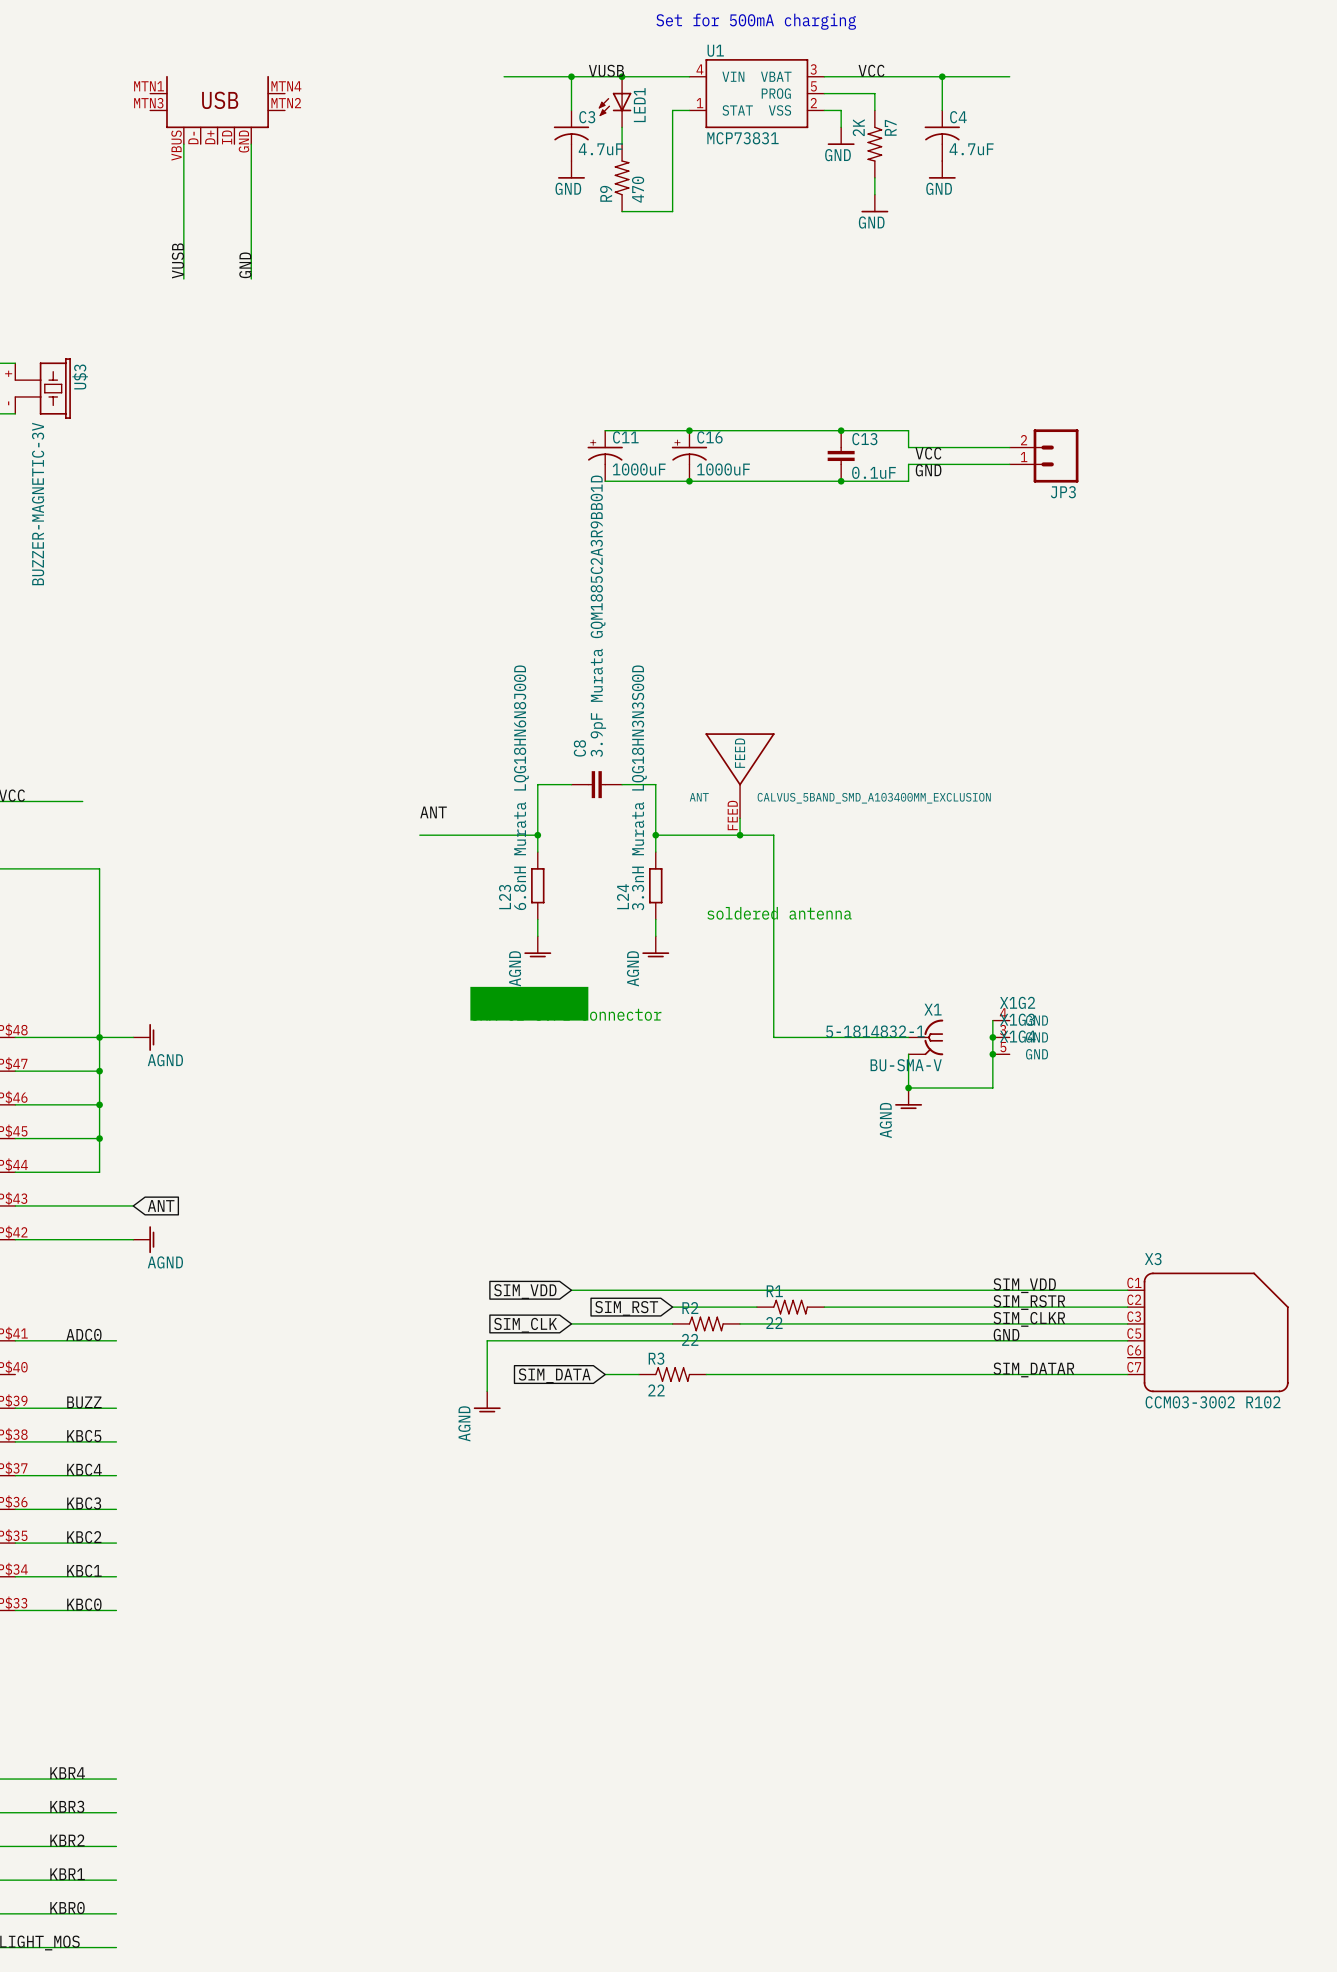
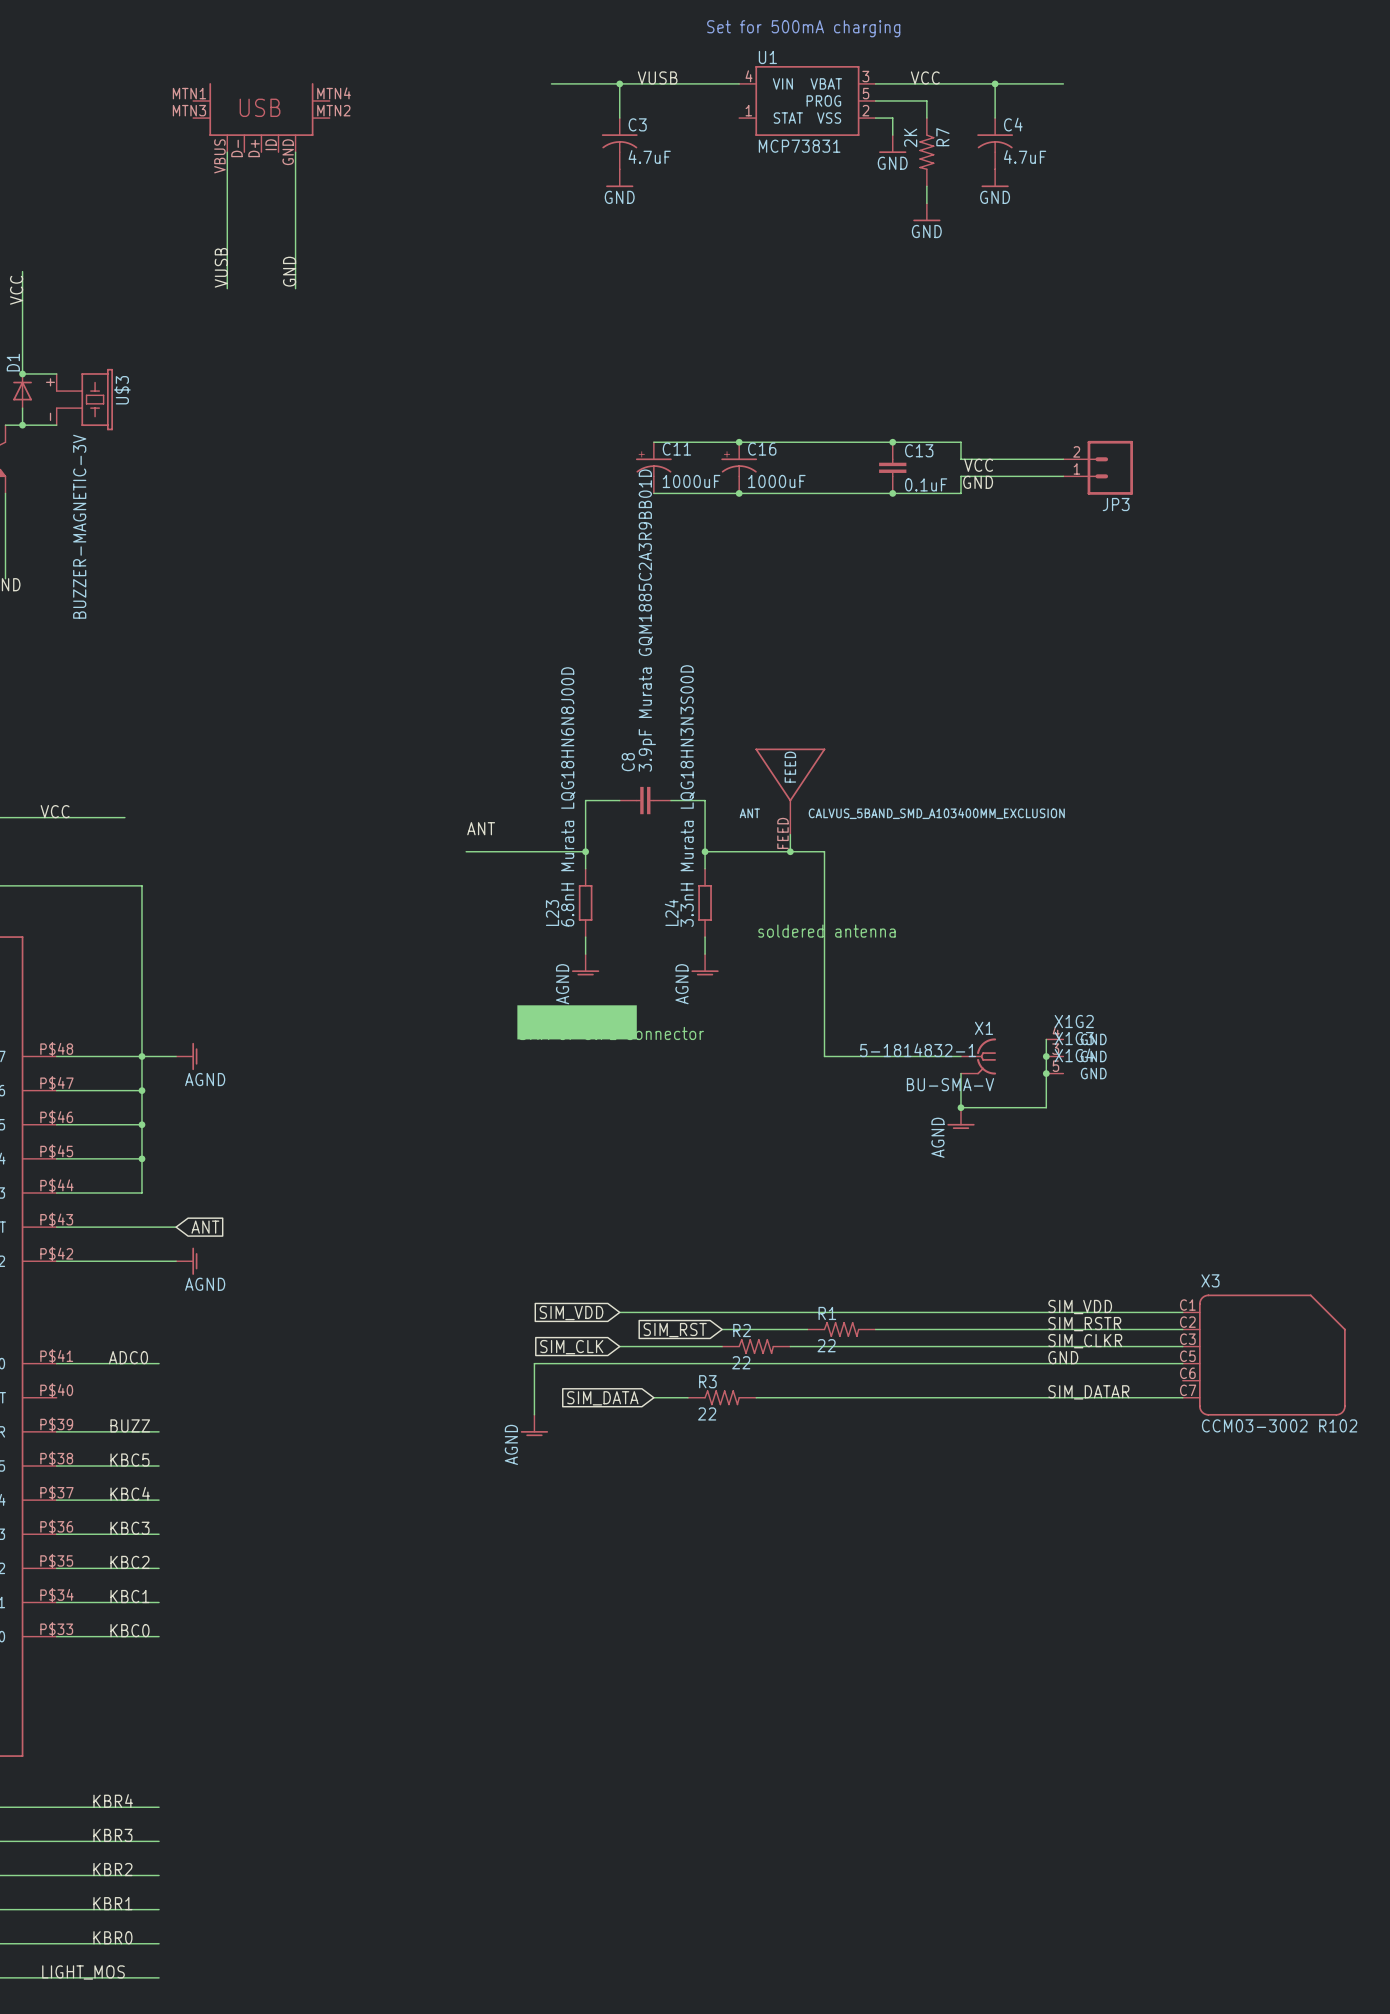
junction: (622, 76) -> none
LED1: (615, 102) -> none
wire: (689, 110) (672, 110) (672, 211) (622, 211) -> none
wire: (622, 127) (622, 144) -> none
R9: 470 (622, 177) -> none

